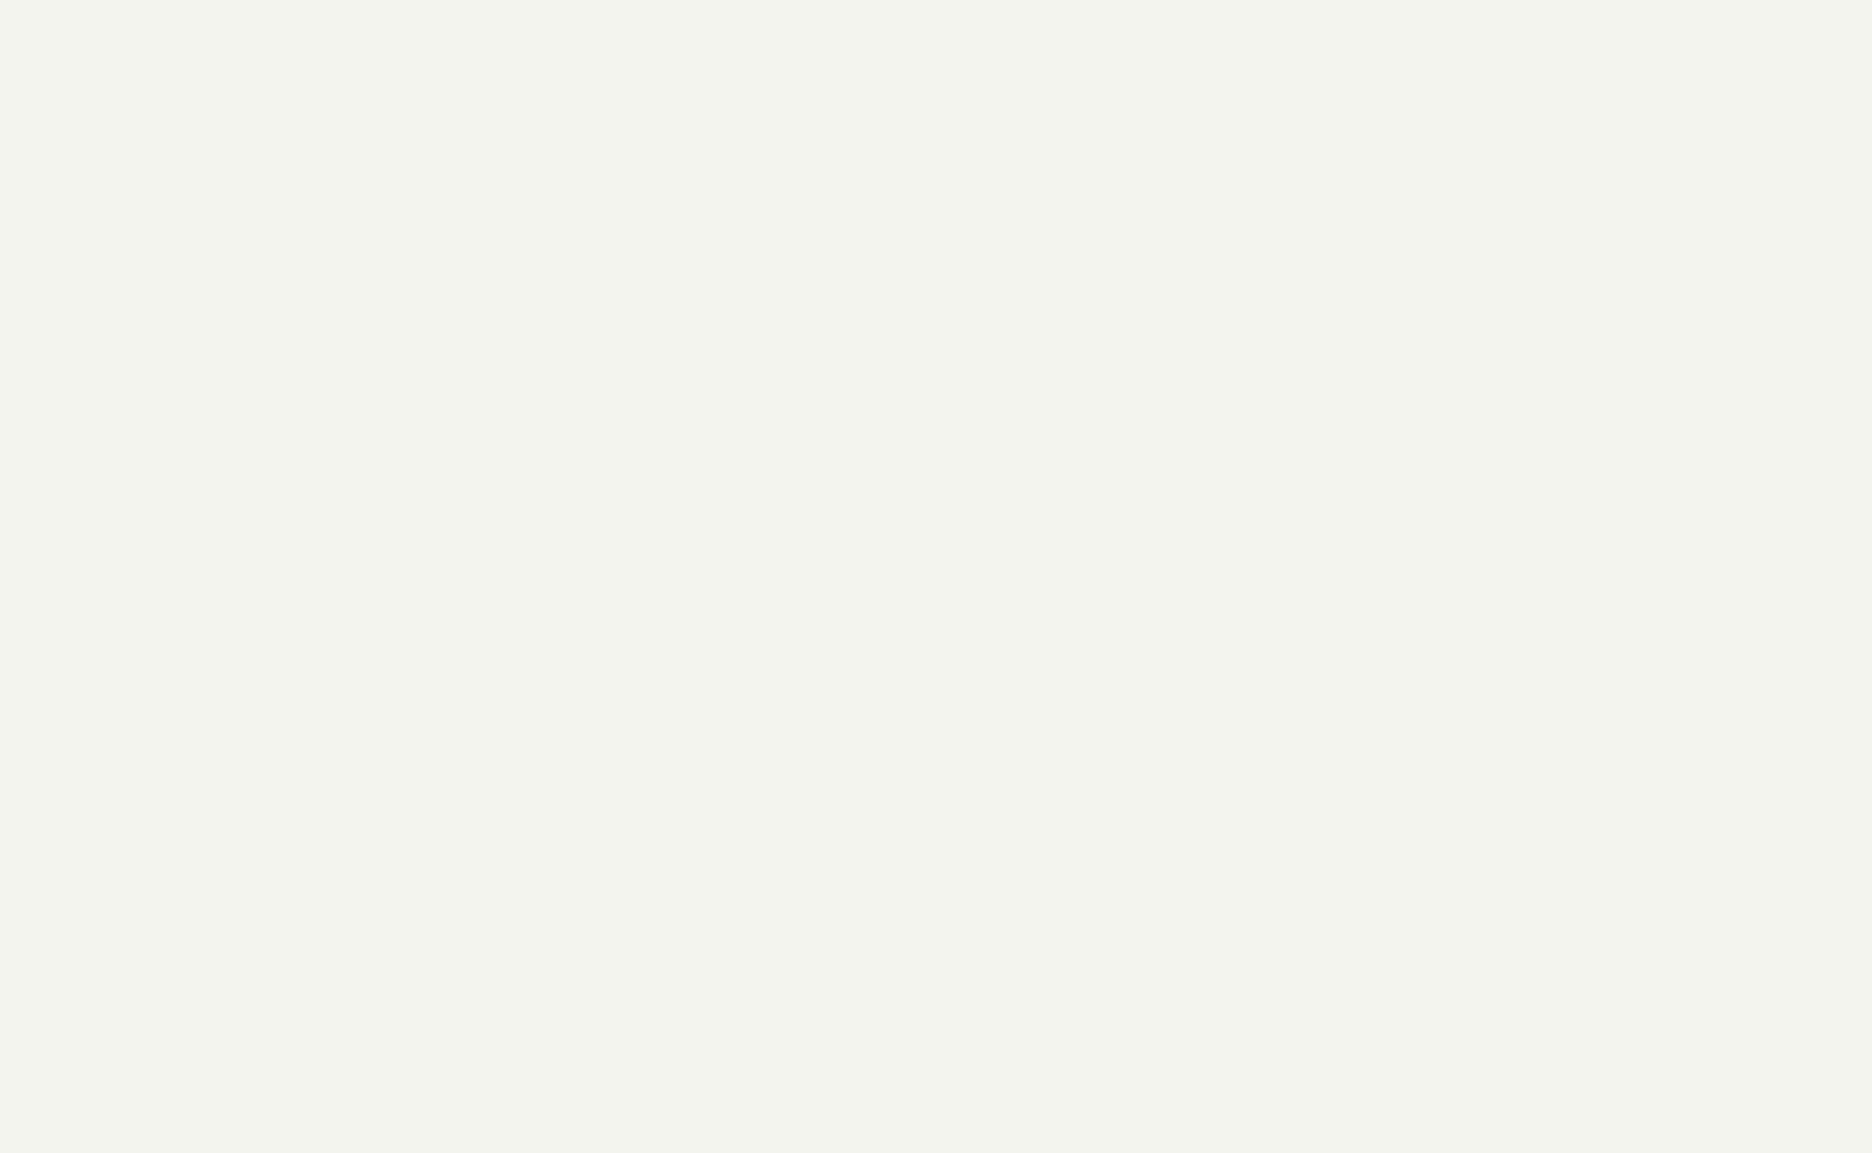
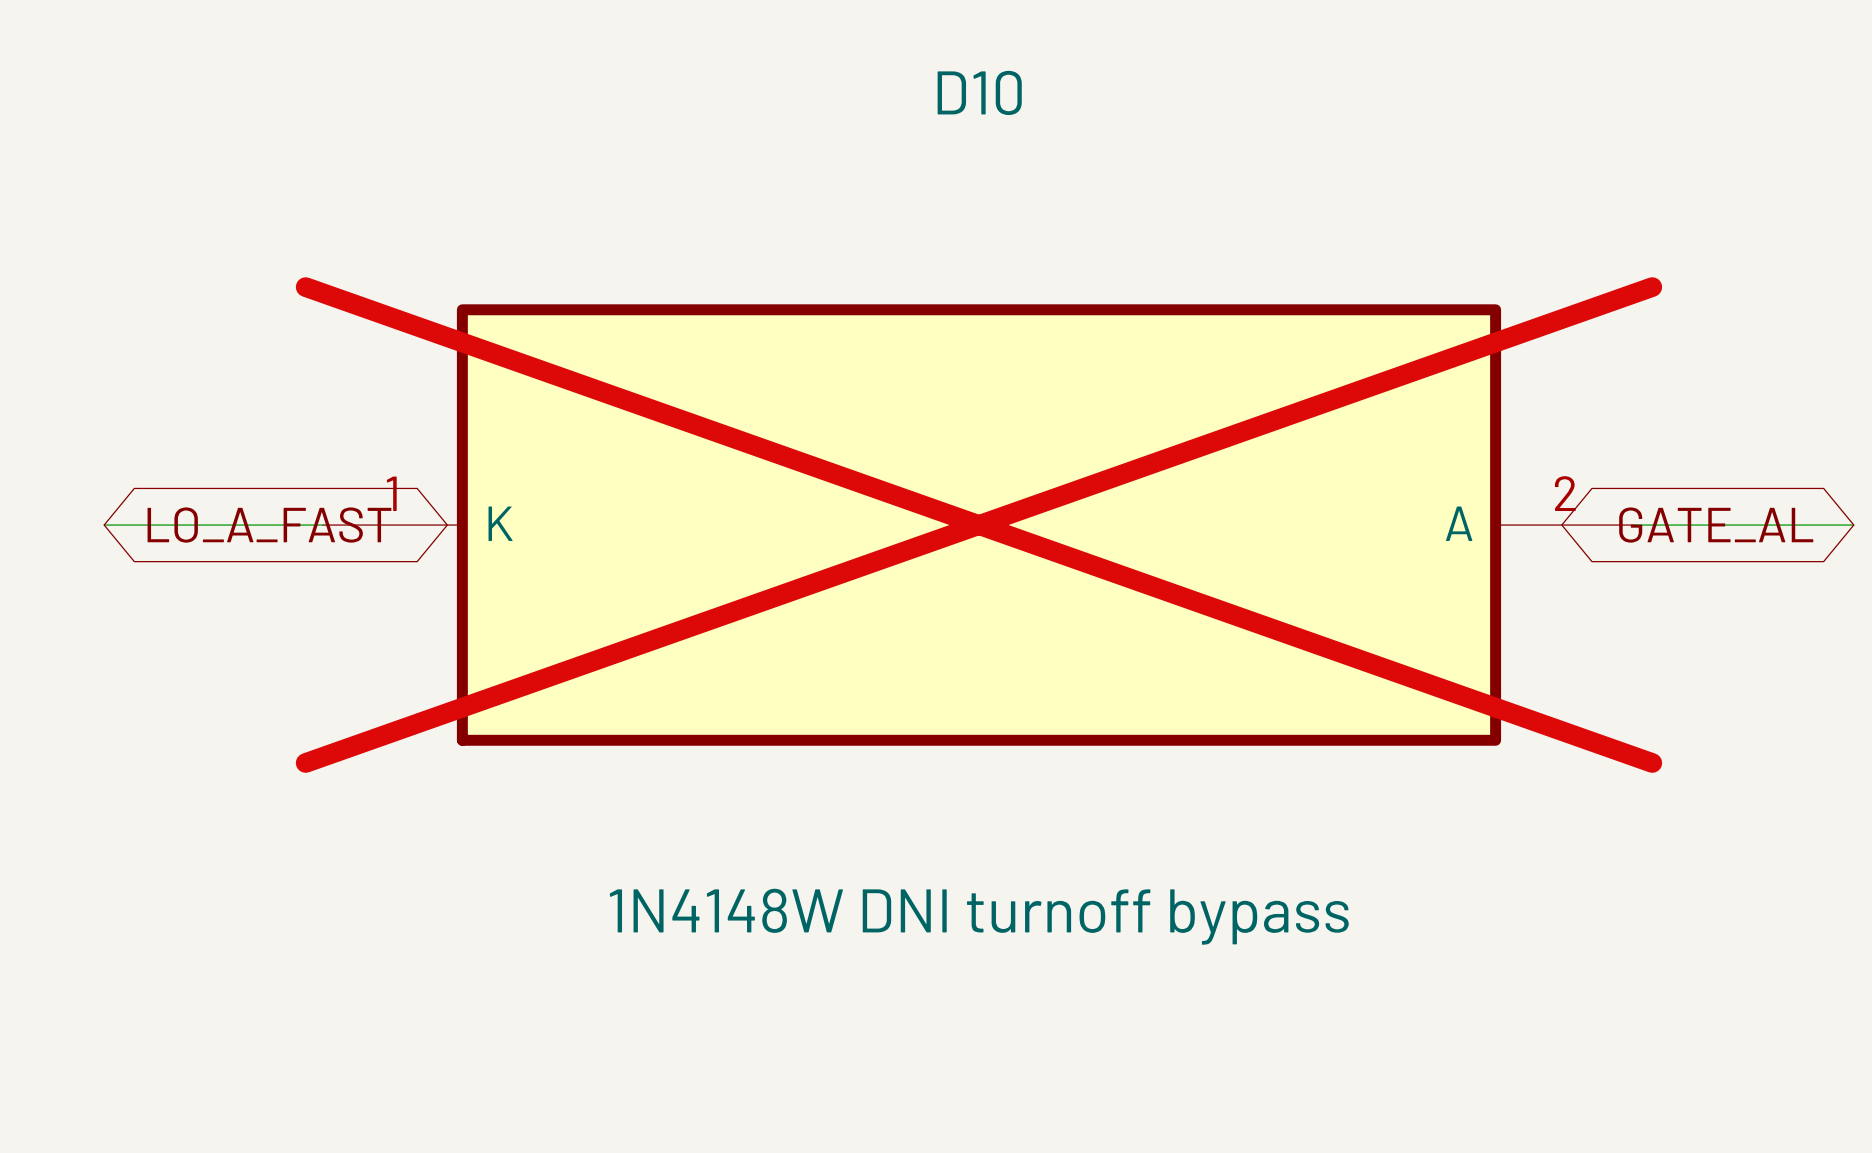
wire: none -> (104, 525) (322, 525)
global label: none -> LO_A_FAST (269, 525)
D10: none -> 1N4148W DNI turnoff bypass (978, 525)
wire: none -> (1635, 525) (1853, 525)
global label: none -> GATE_AL (1716, 525)

